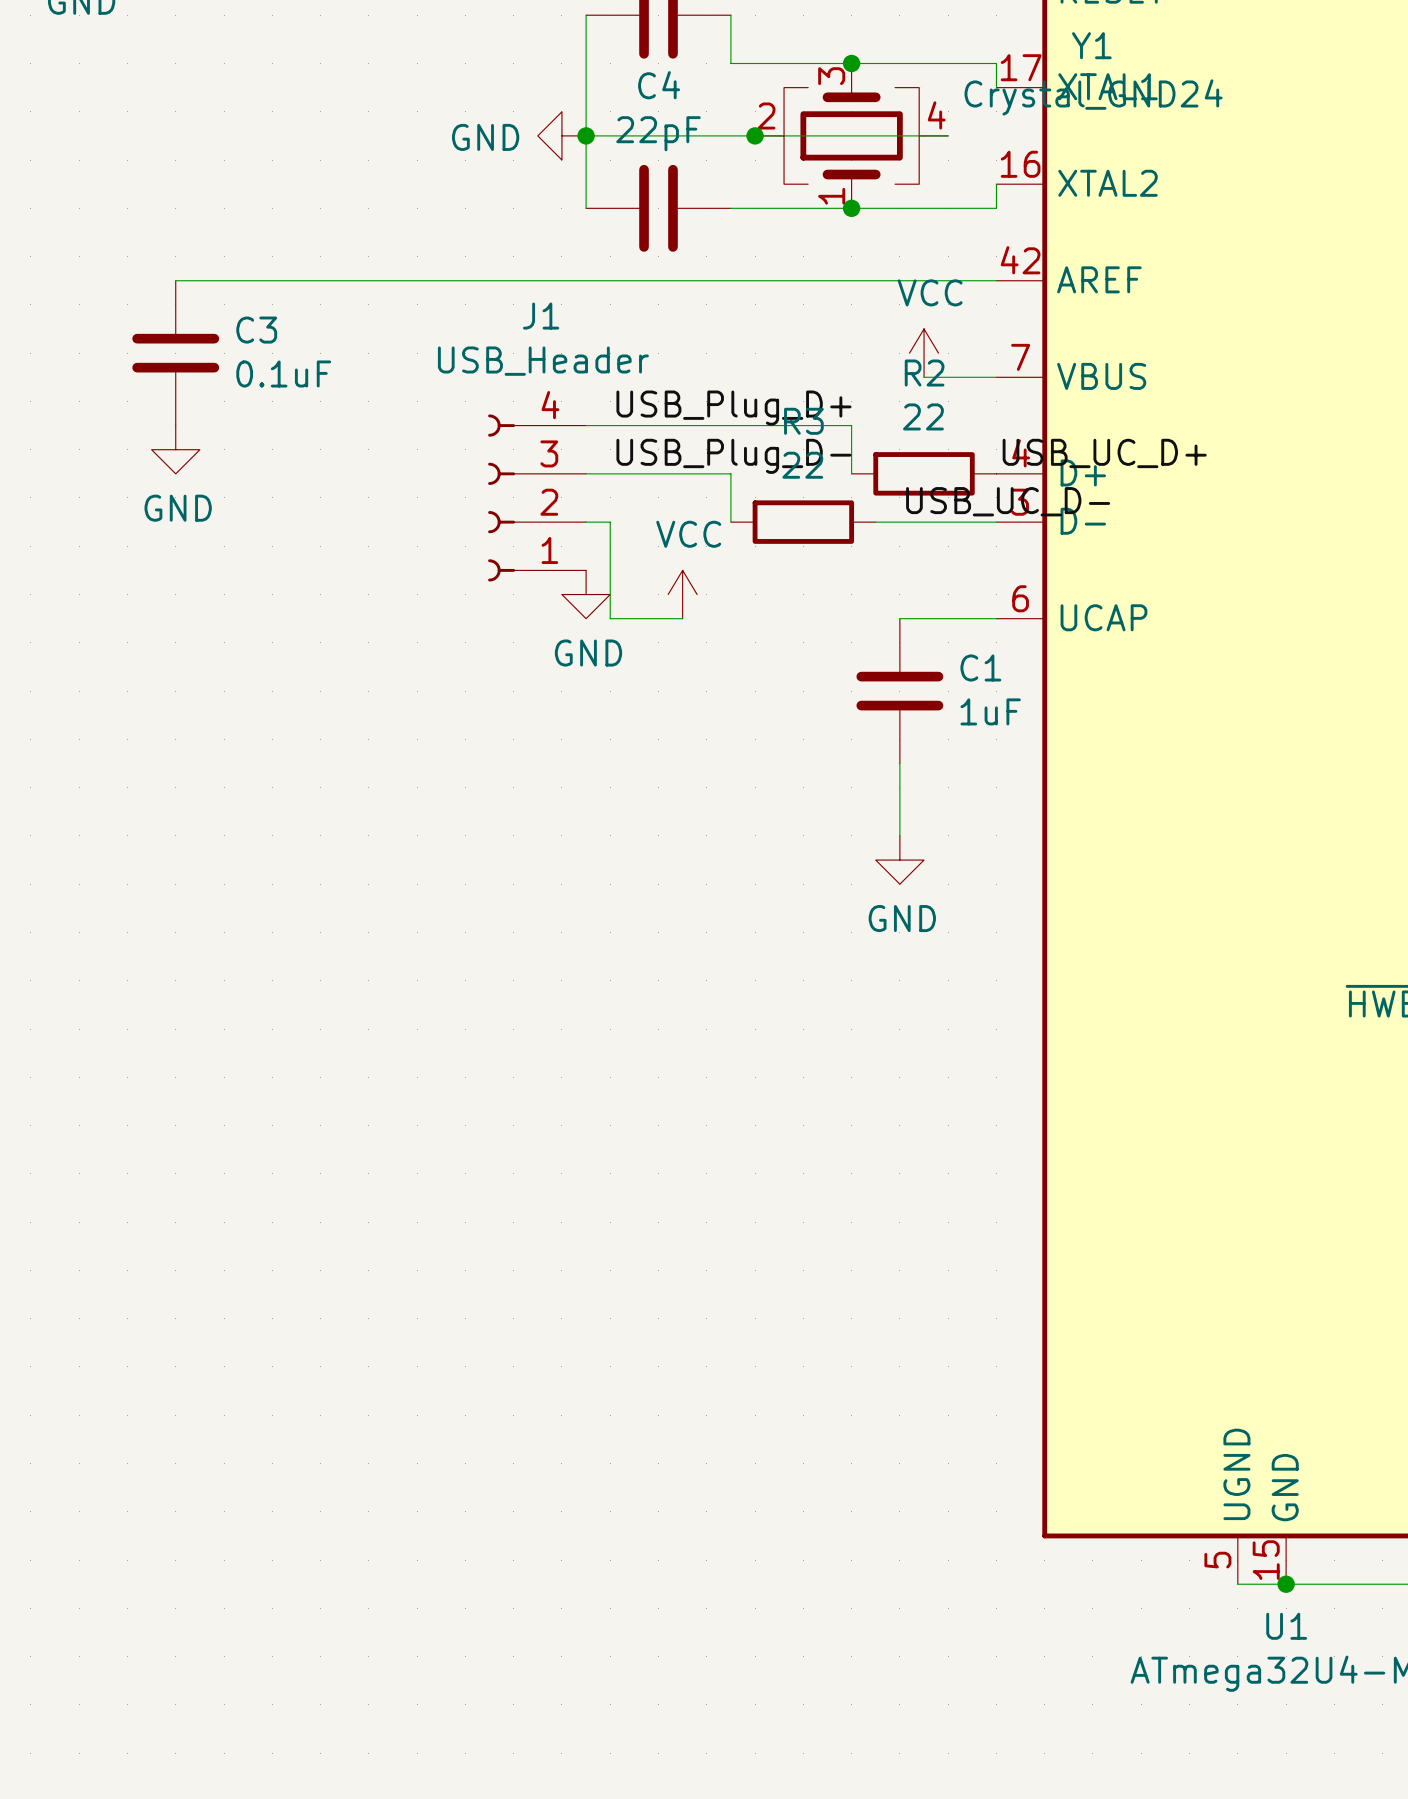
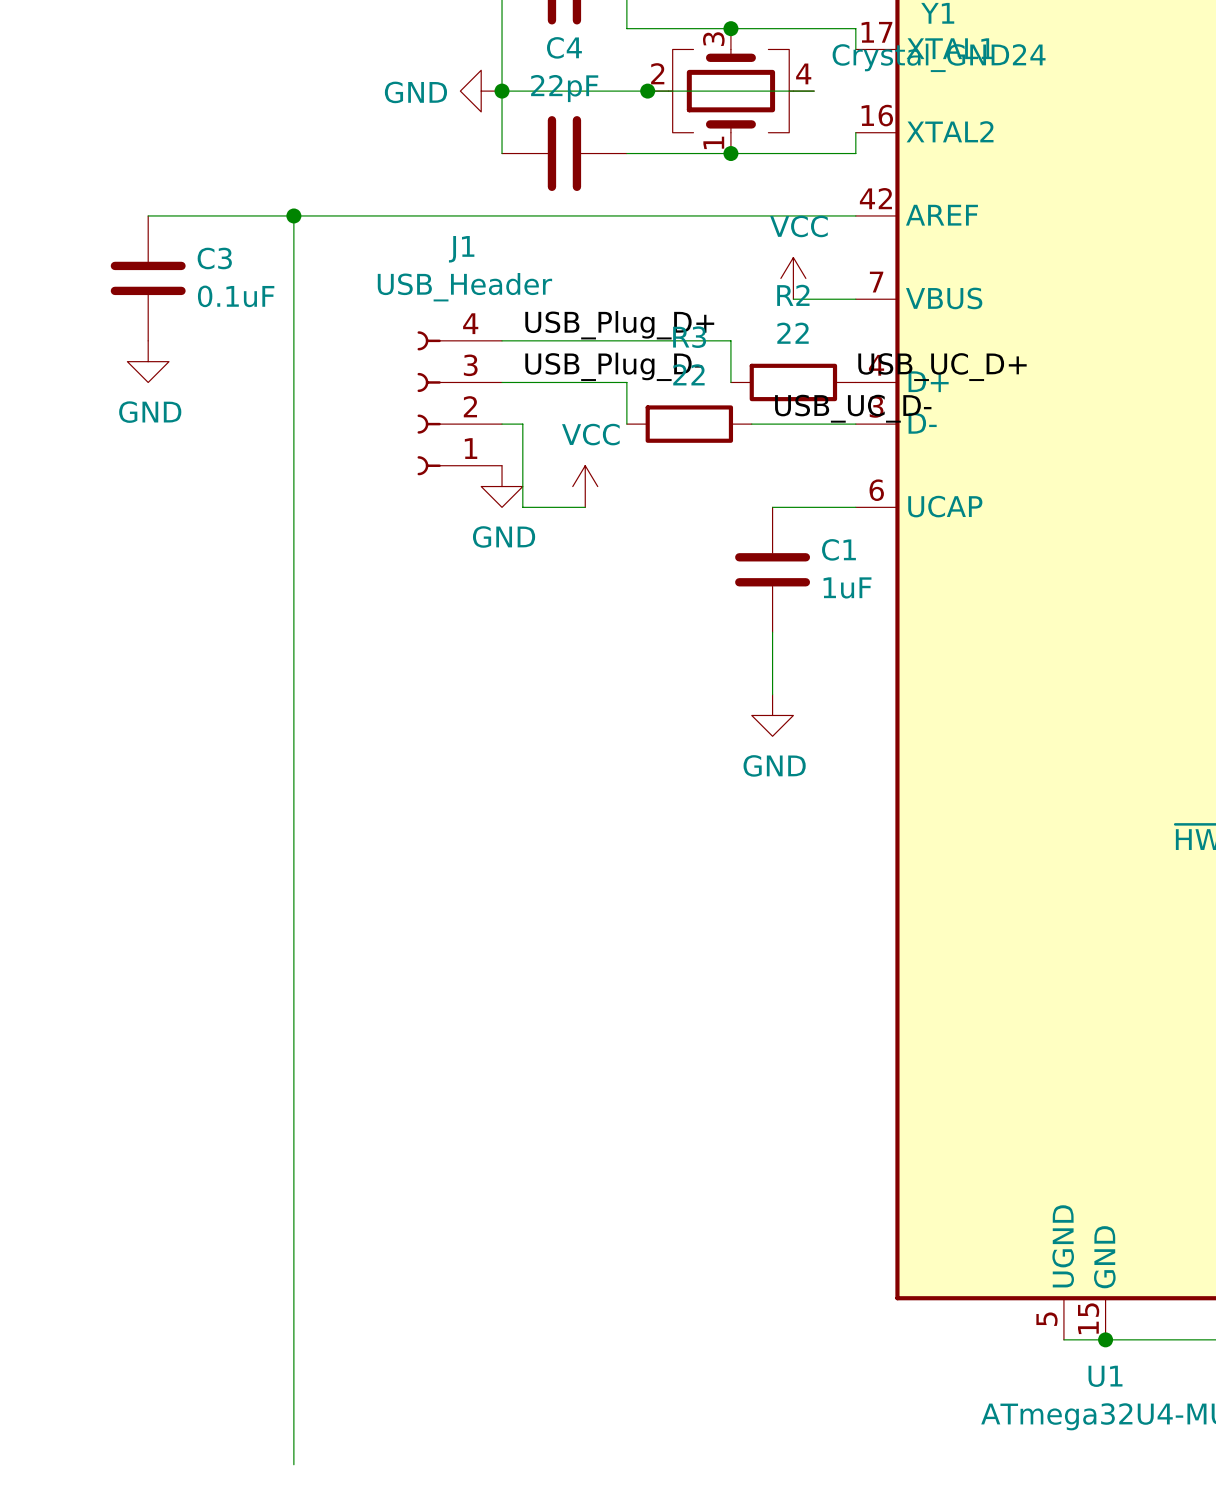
wire: none -> (293, 215) (293, 1464)
junction: none -> (293, 215)

